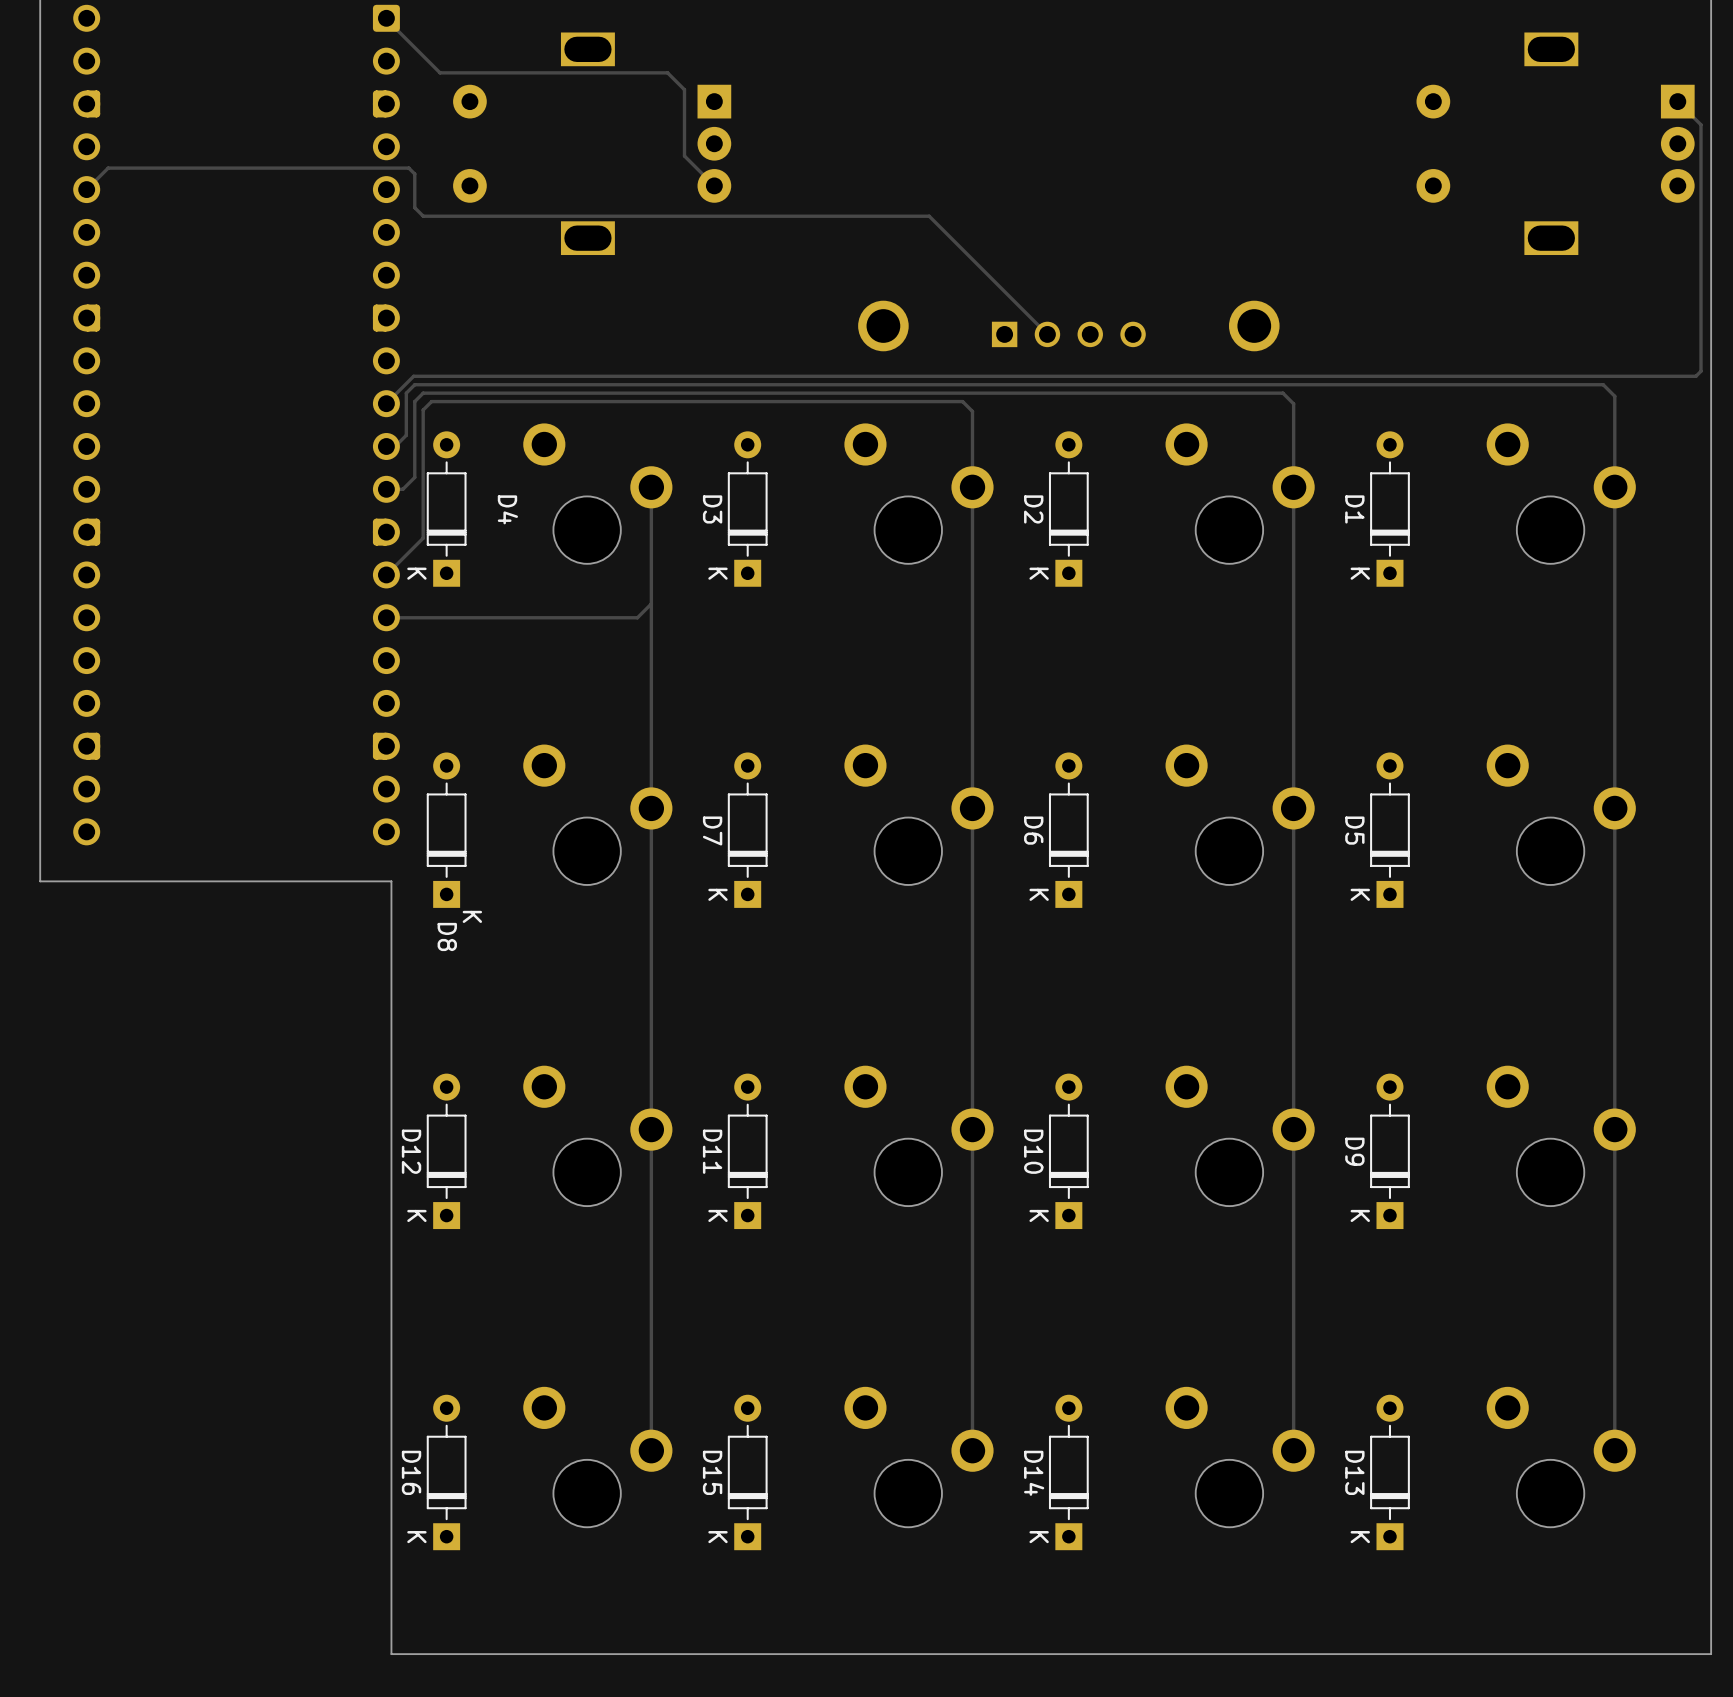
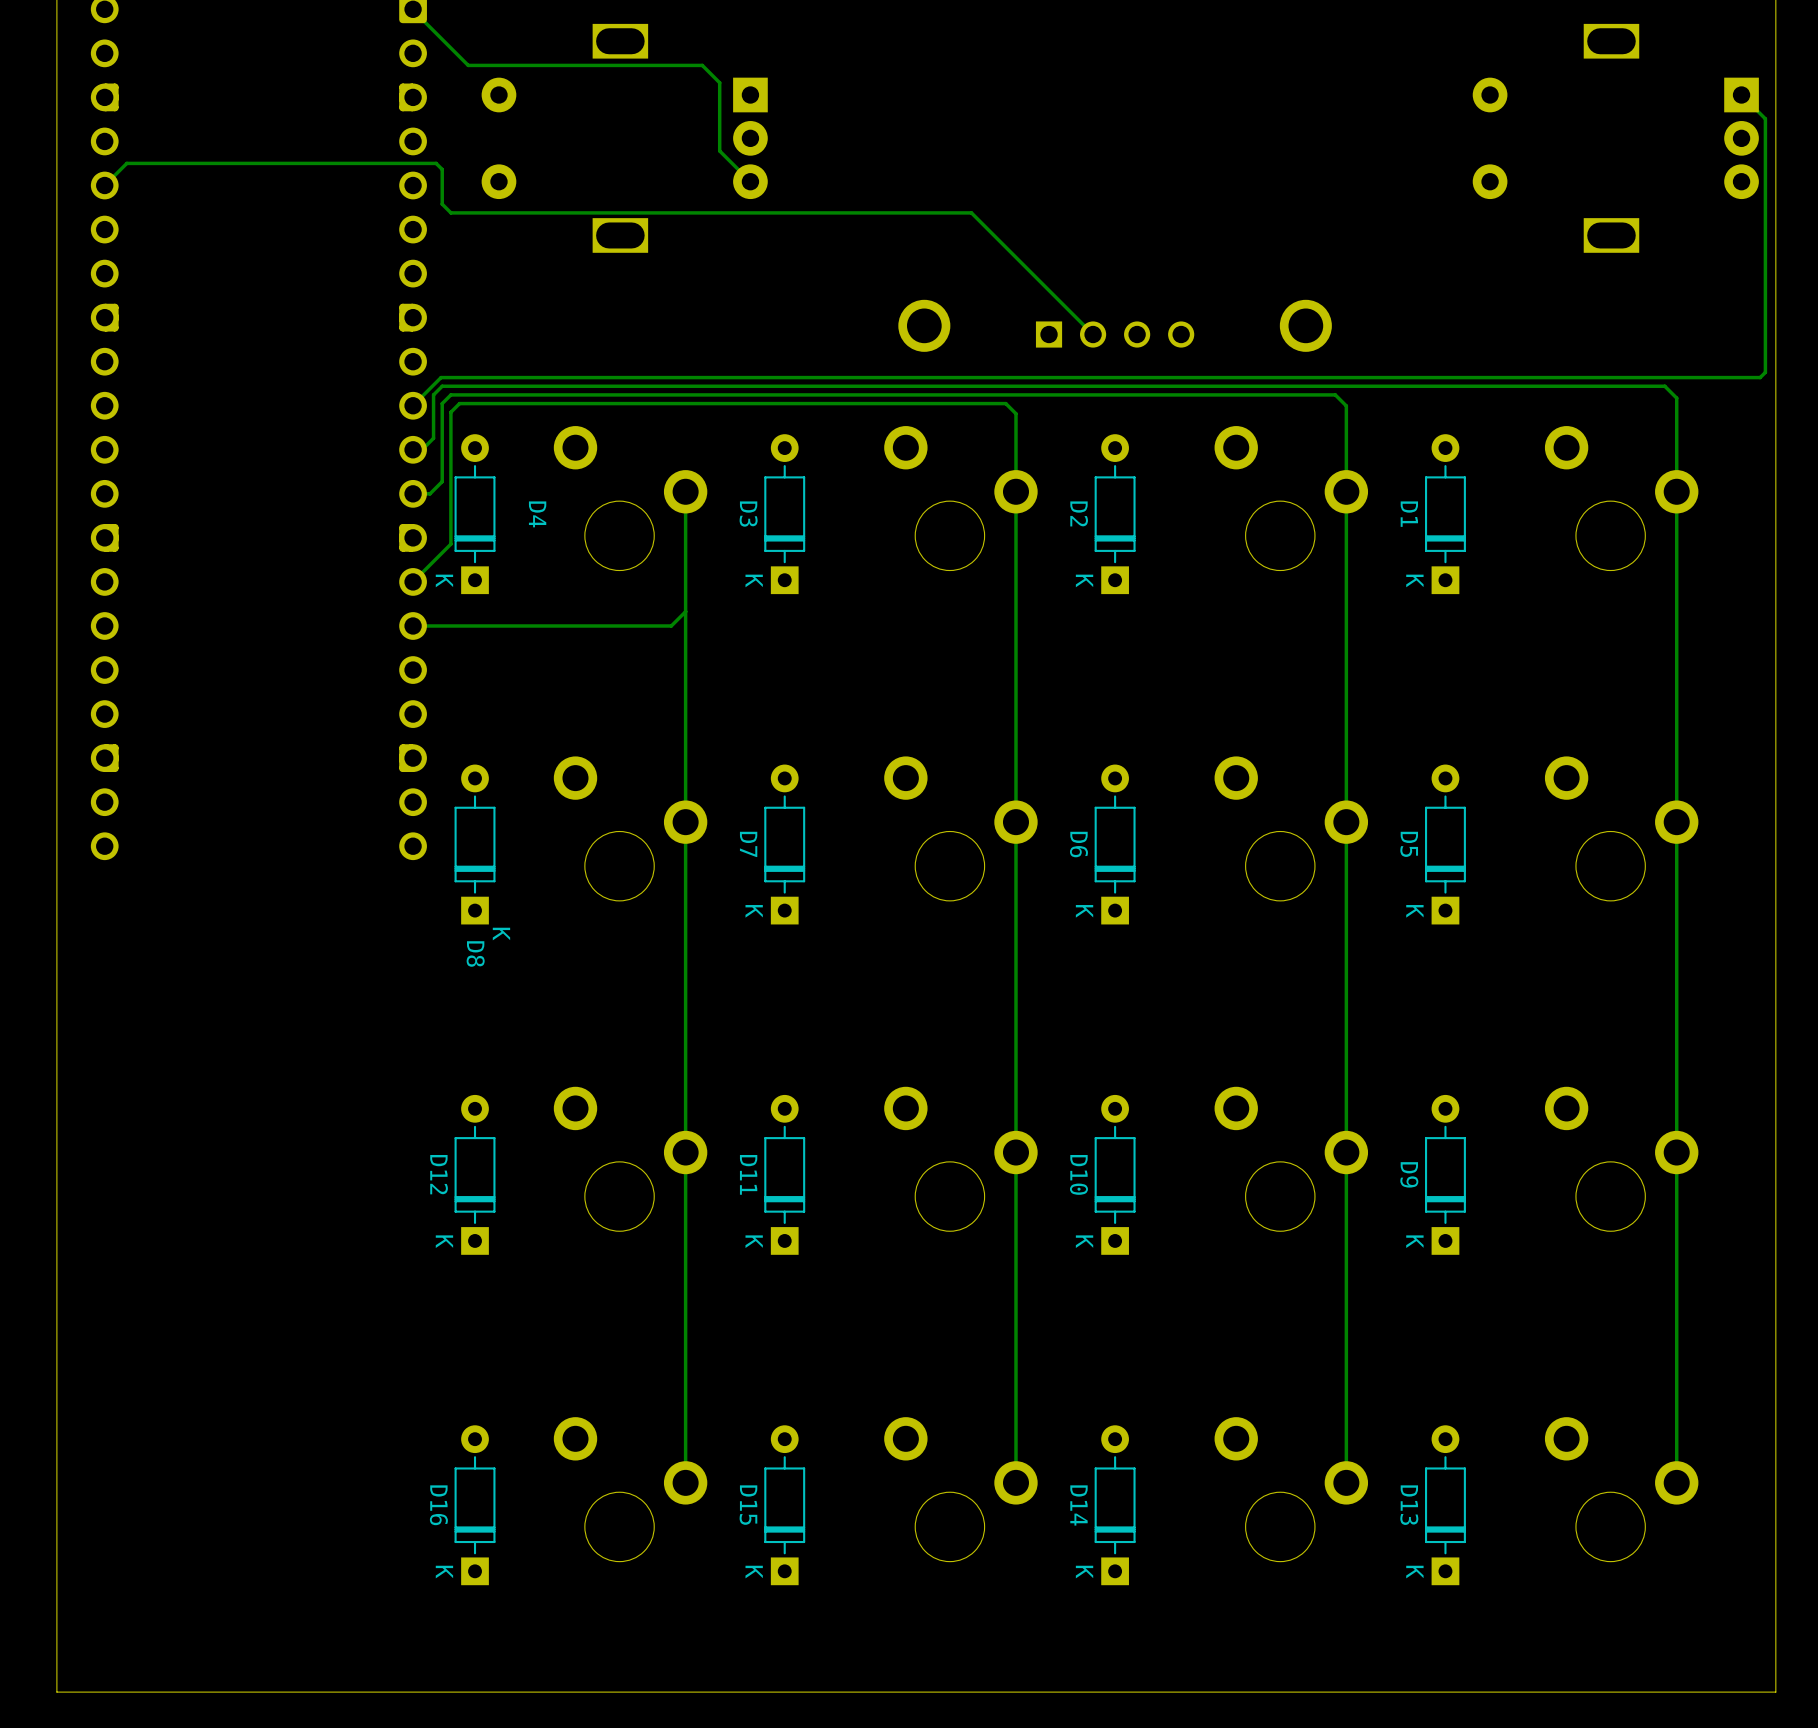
board edge: (40, 881) (391, 881) (391, 1654) -> (56, 897) (56, 1692) (418, 1692)

